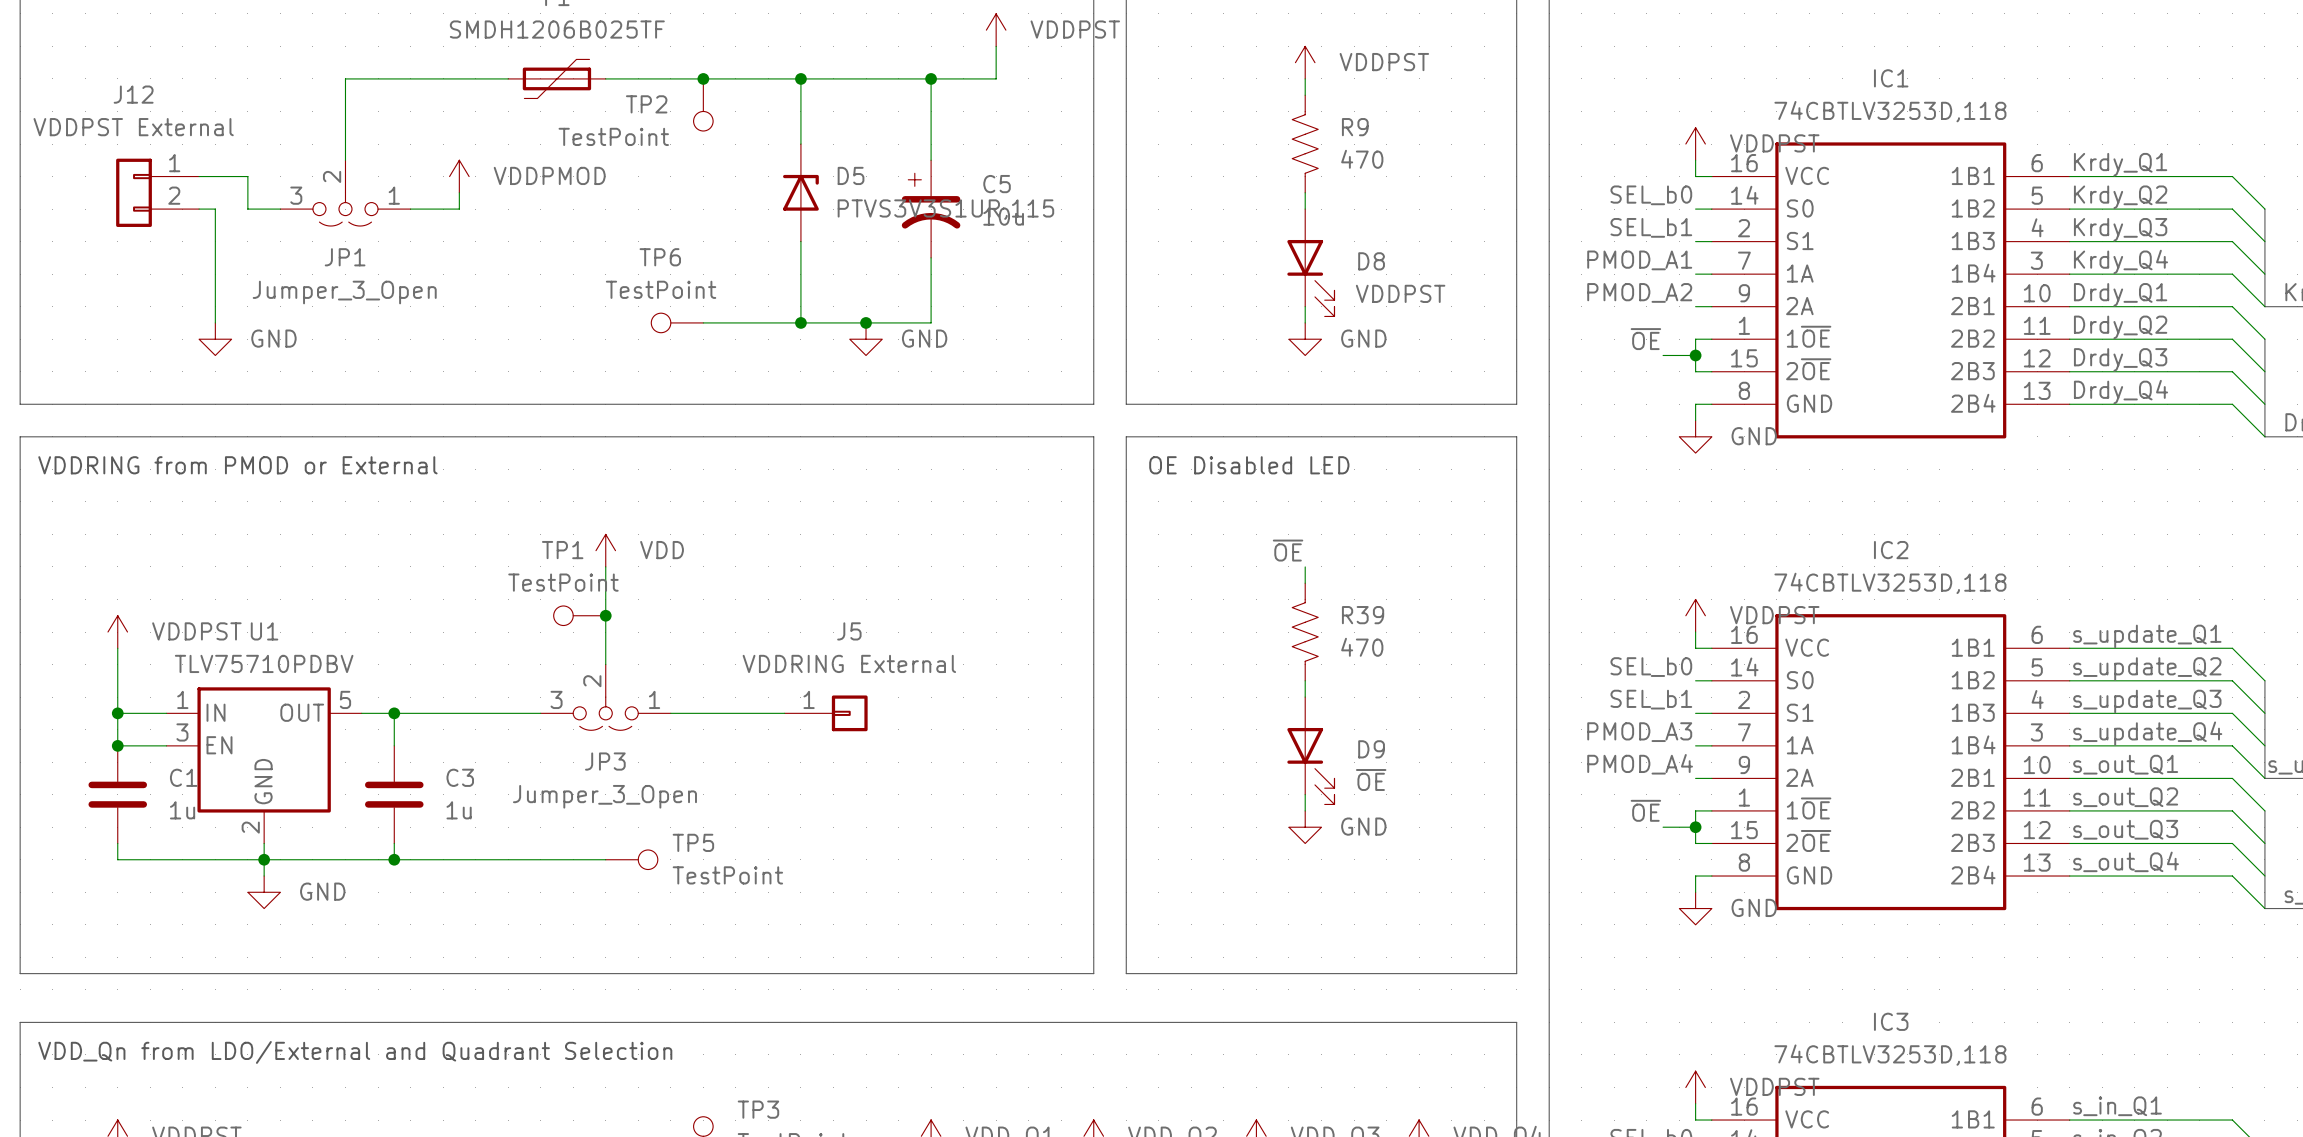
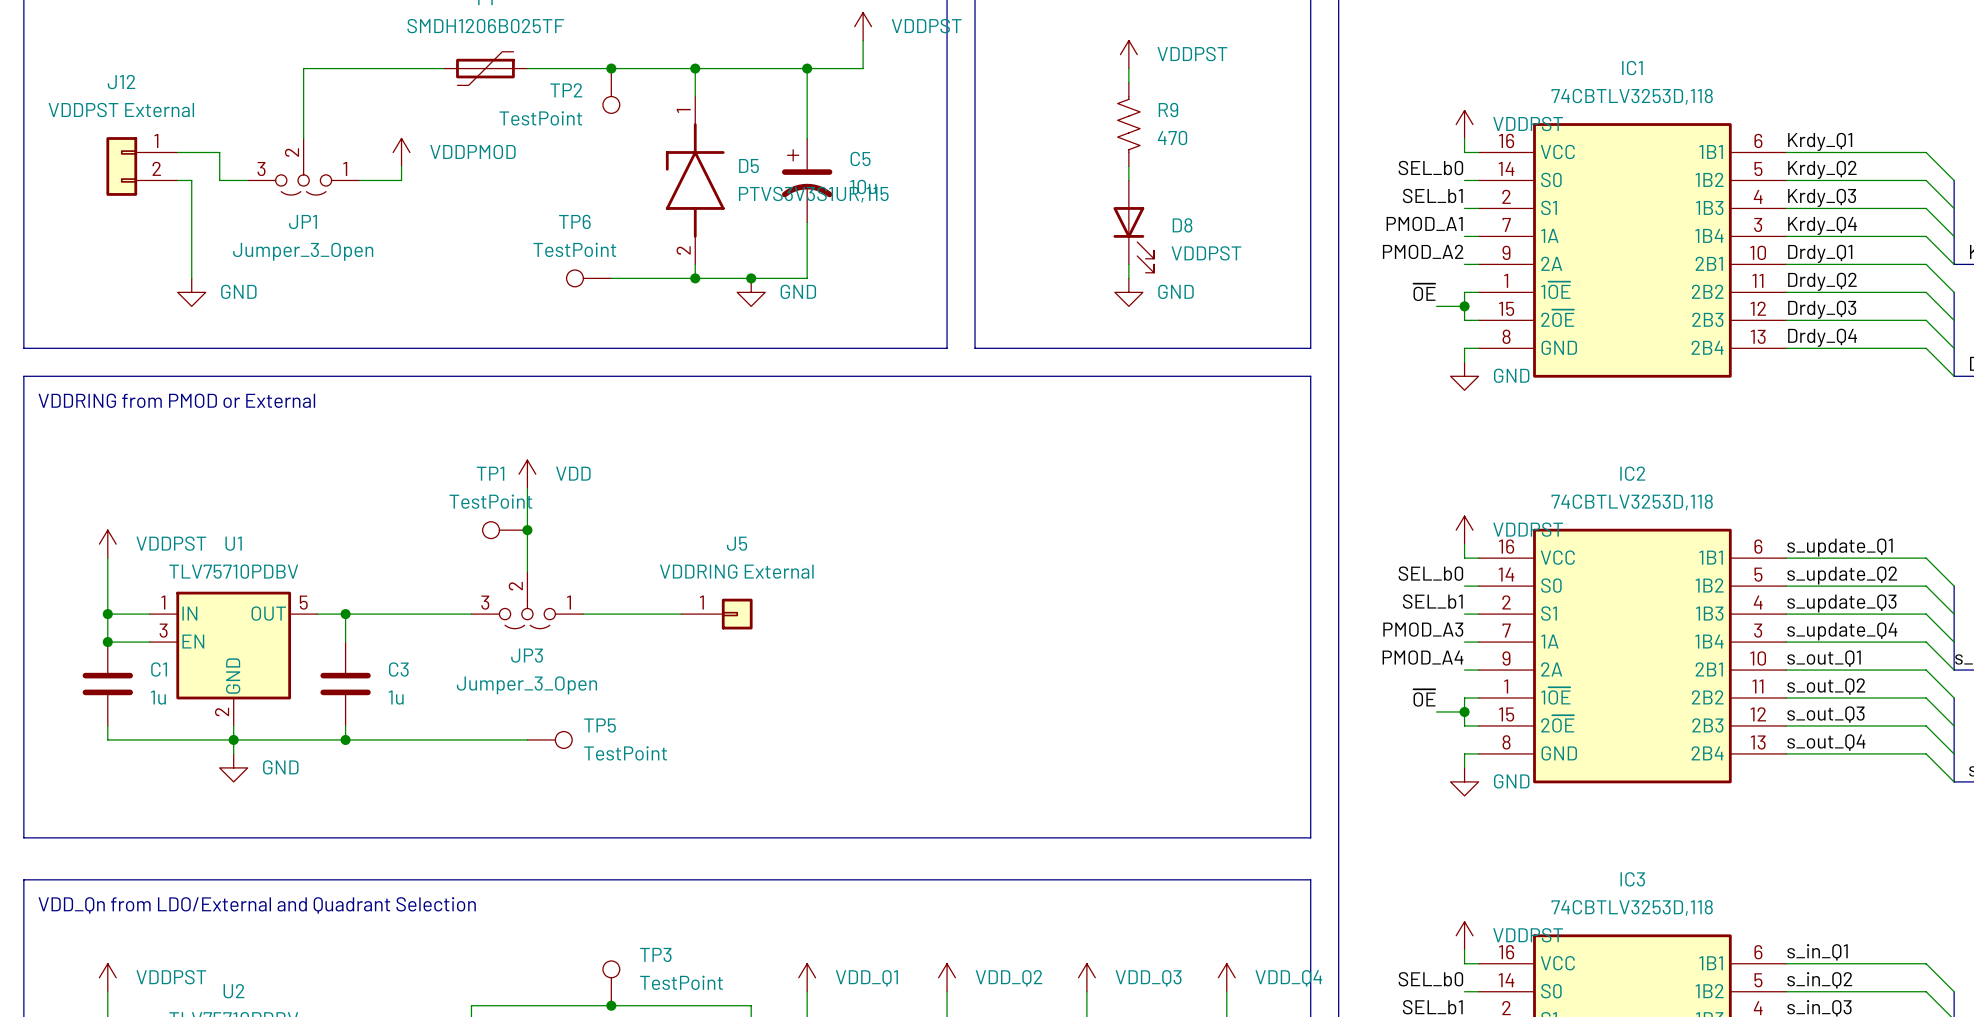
D5 symbol: [783, 144, 819, 242] -> [665, 96, 725, 265]
line: (1093, 436) (1093, 973) -> (947, 376) (975, 376)
line: (1126, 436) (1126, 973) -> (947, 837) (975, 837)
text: OE Disabled LED (1249, 465) -> none
label: ~{OE} (1288, 550) -> none
wire: (1305, 566) (1305, 583) -> none
R39: 470 (1305, 632) -> none
wire: (1305, 680) (1305, 697) -> none
D9: ~{OE} (1310, 750) -> none
wire: (1305, 794) (1305, 810) -> none
power symbol: GND (1305, 827) -> none

